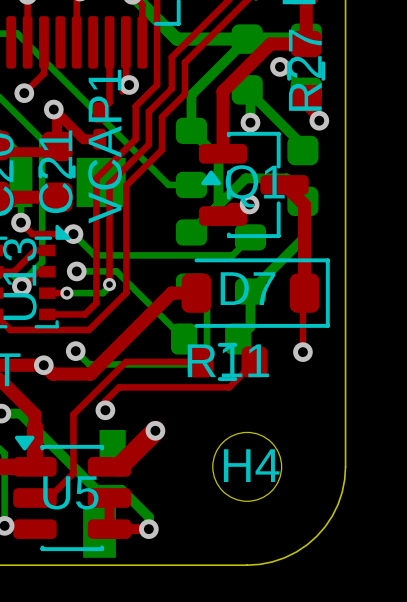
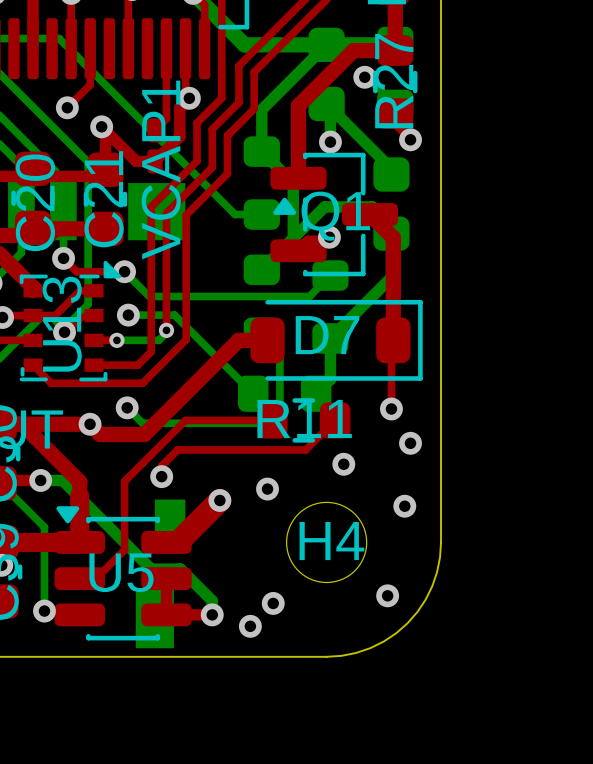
top track: none -> (189, 98) (179, 107) (179, 136) (155, 161)
via: none -> (410, 443)
via: none -> (343, 464)
via: none -> (267, 489)
via: none -> (404, 506)
via: none -> (387, 595)
via: none -> (273, 603)
via: none -> (250, 626)

